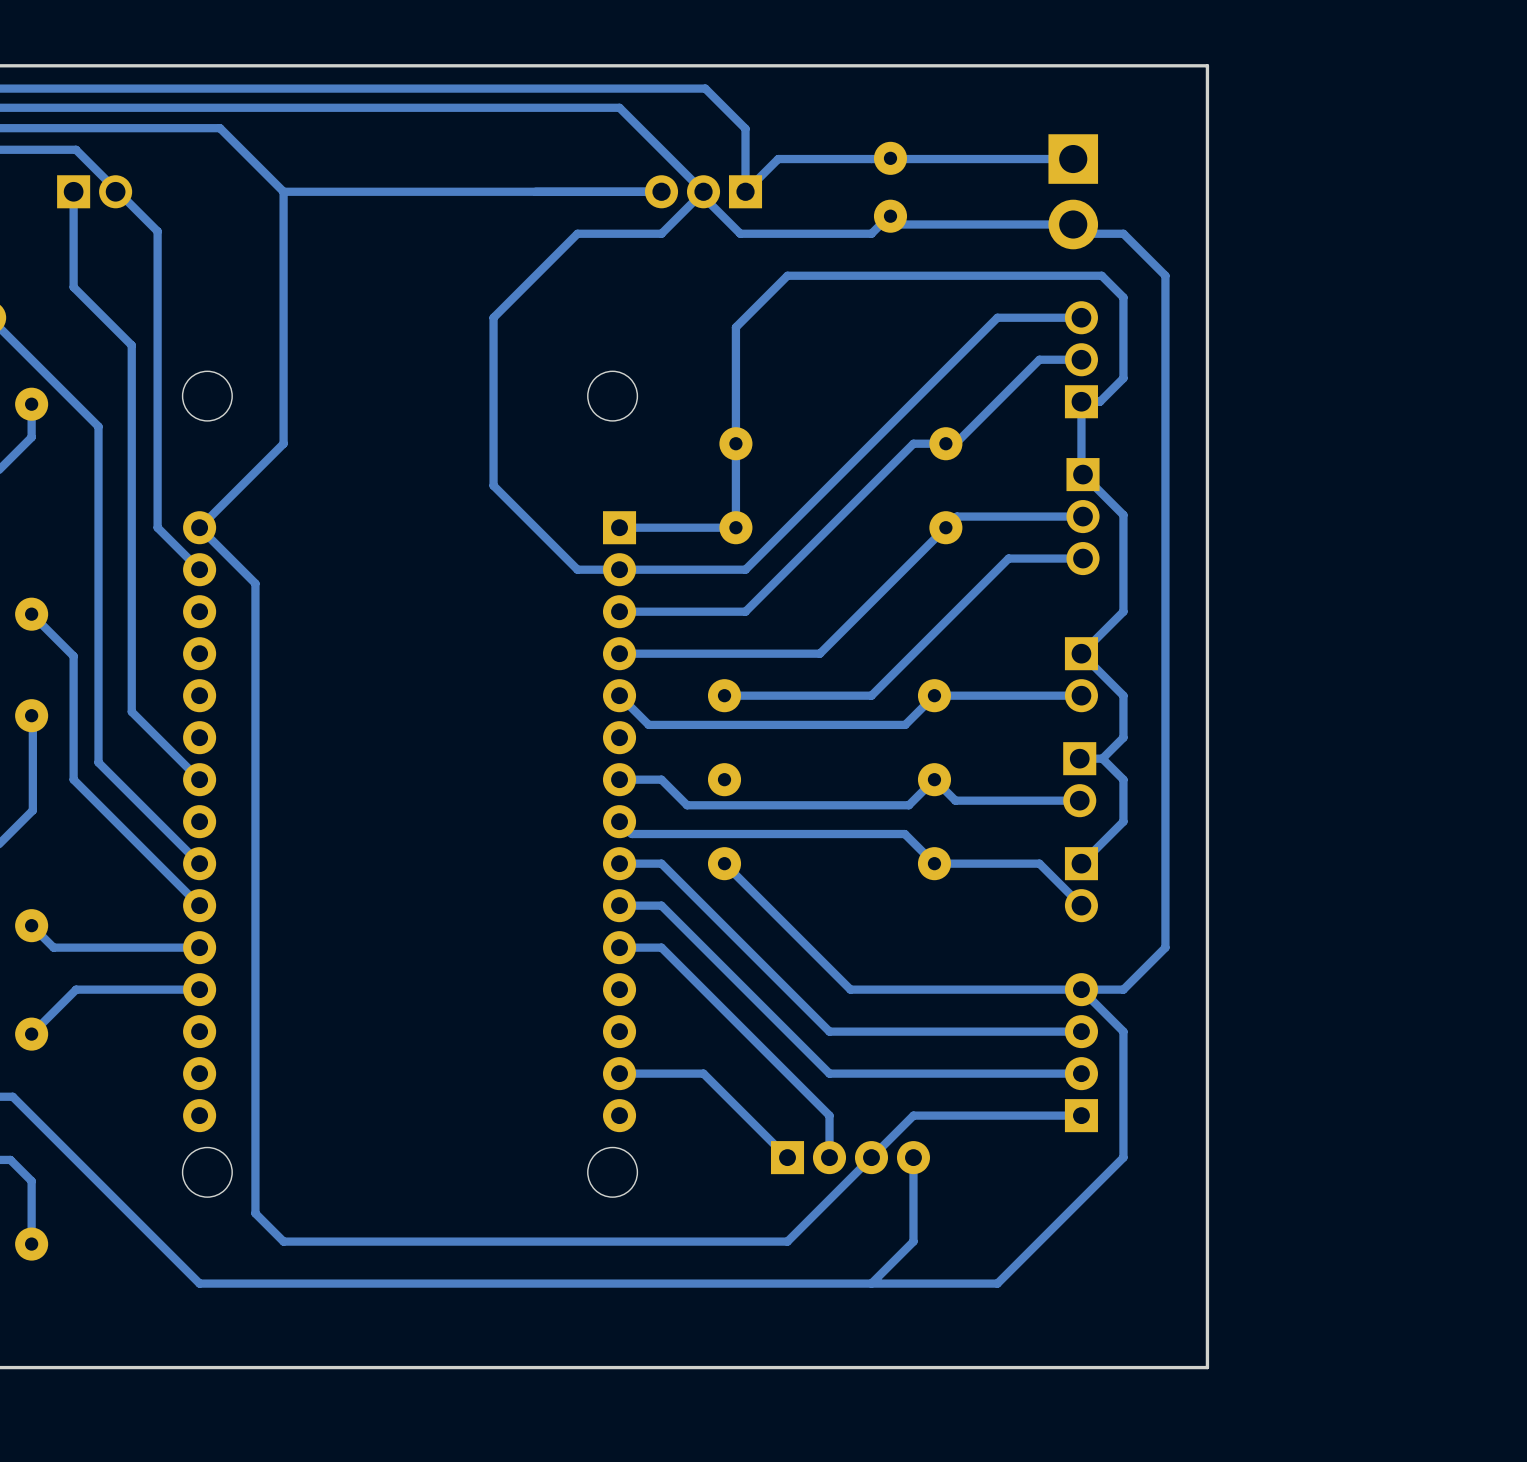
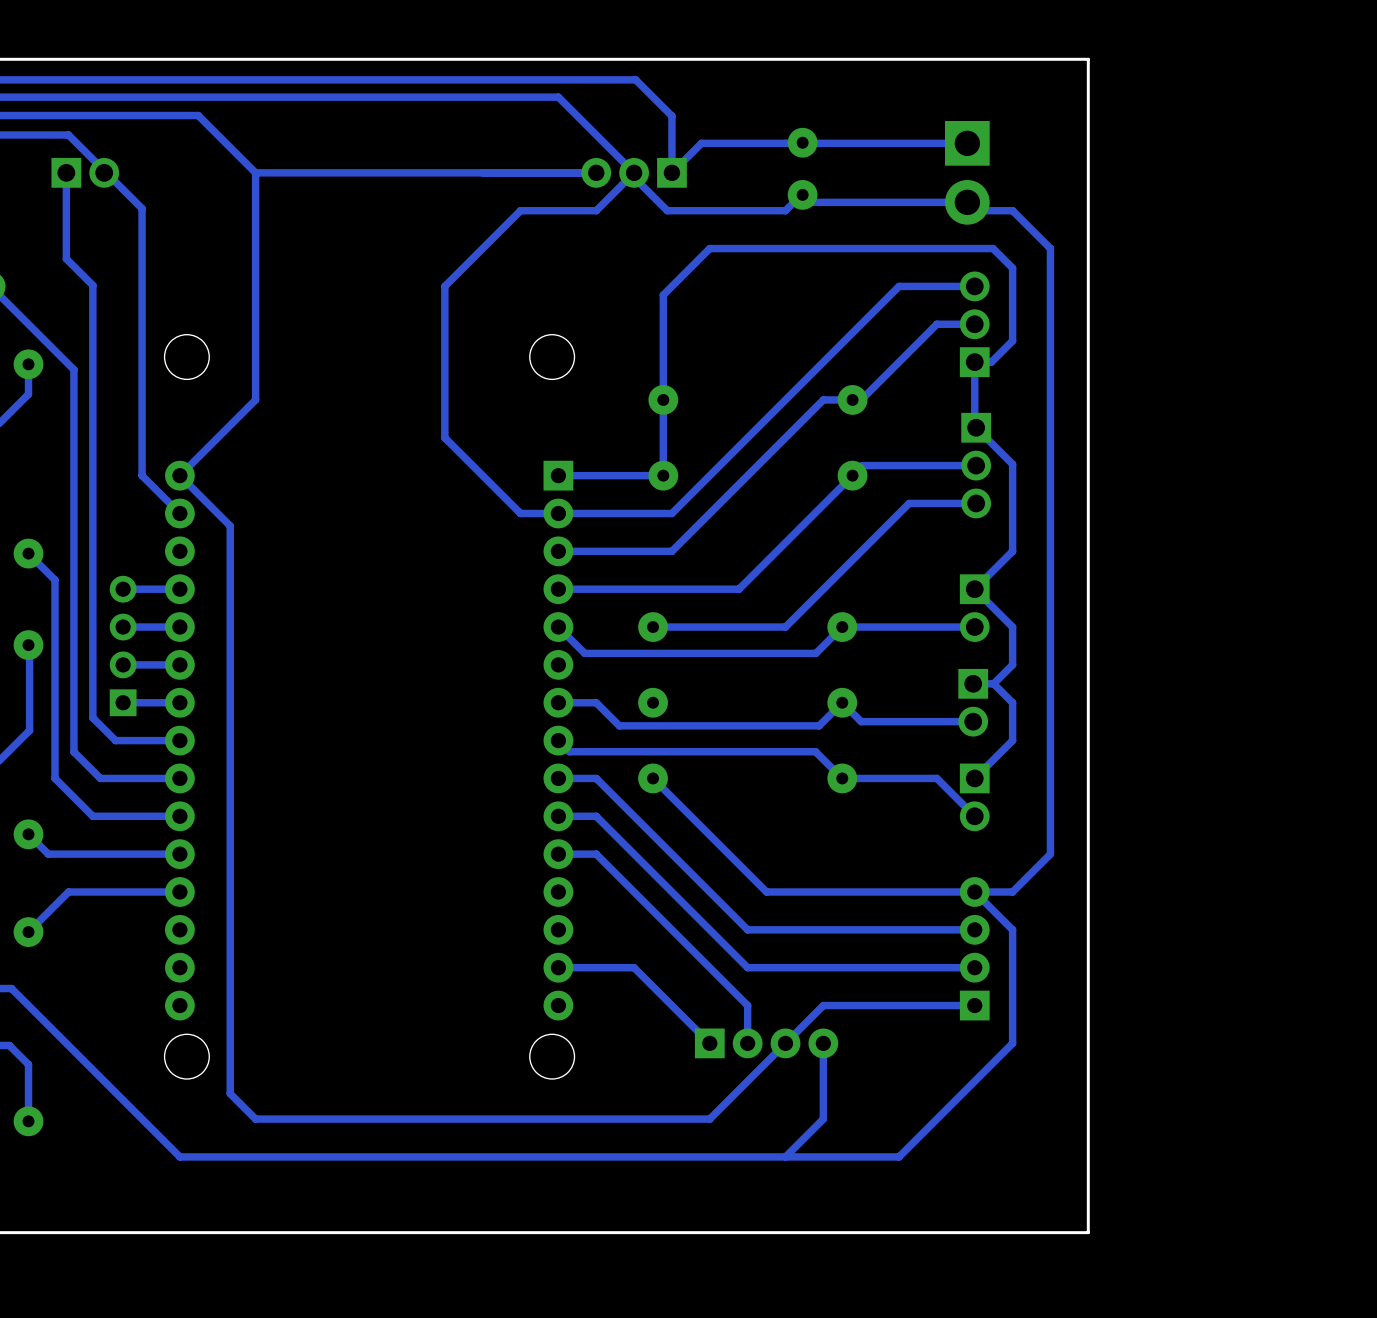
track: (103, 316) (131, 345) (131, 711) (199, 779) -> (92, 285) (92, 717) (115, 740) (179, 740)
track: (82, 410) (98, 426) (98, 762) (199, 863) -> (73, 369) (73, 751) (100, 778) (179, 778)
track: (61, 643) (73, 656) (73, 779) (199, 905) -> (55, 580) (55, 778) (92, 816) (179, 816)
track: none -> (179, 589) (123, 589)
track: none -> (179, 627) (123, 627)
part: none -> (123, 645)
track: none -> (179, 664) (123, 664)
track: none -> (179, 702) (123, 702)

